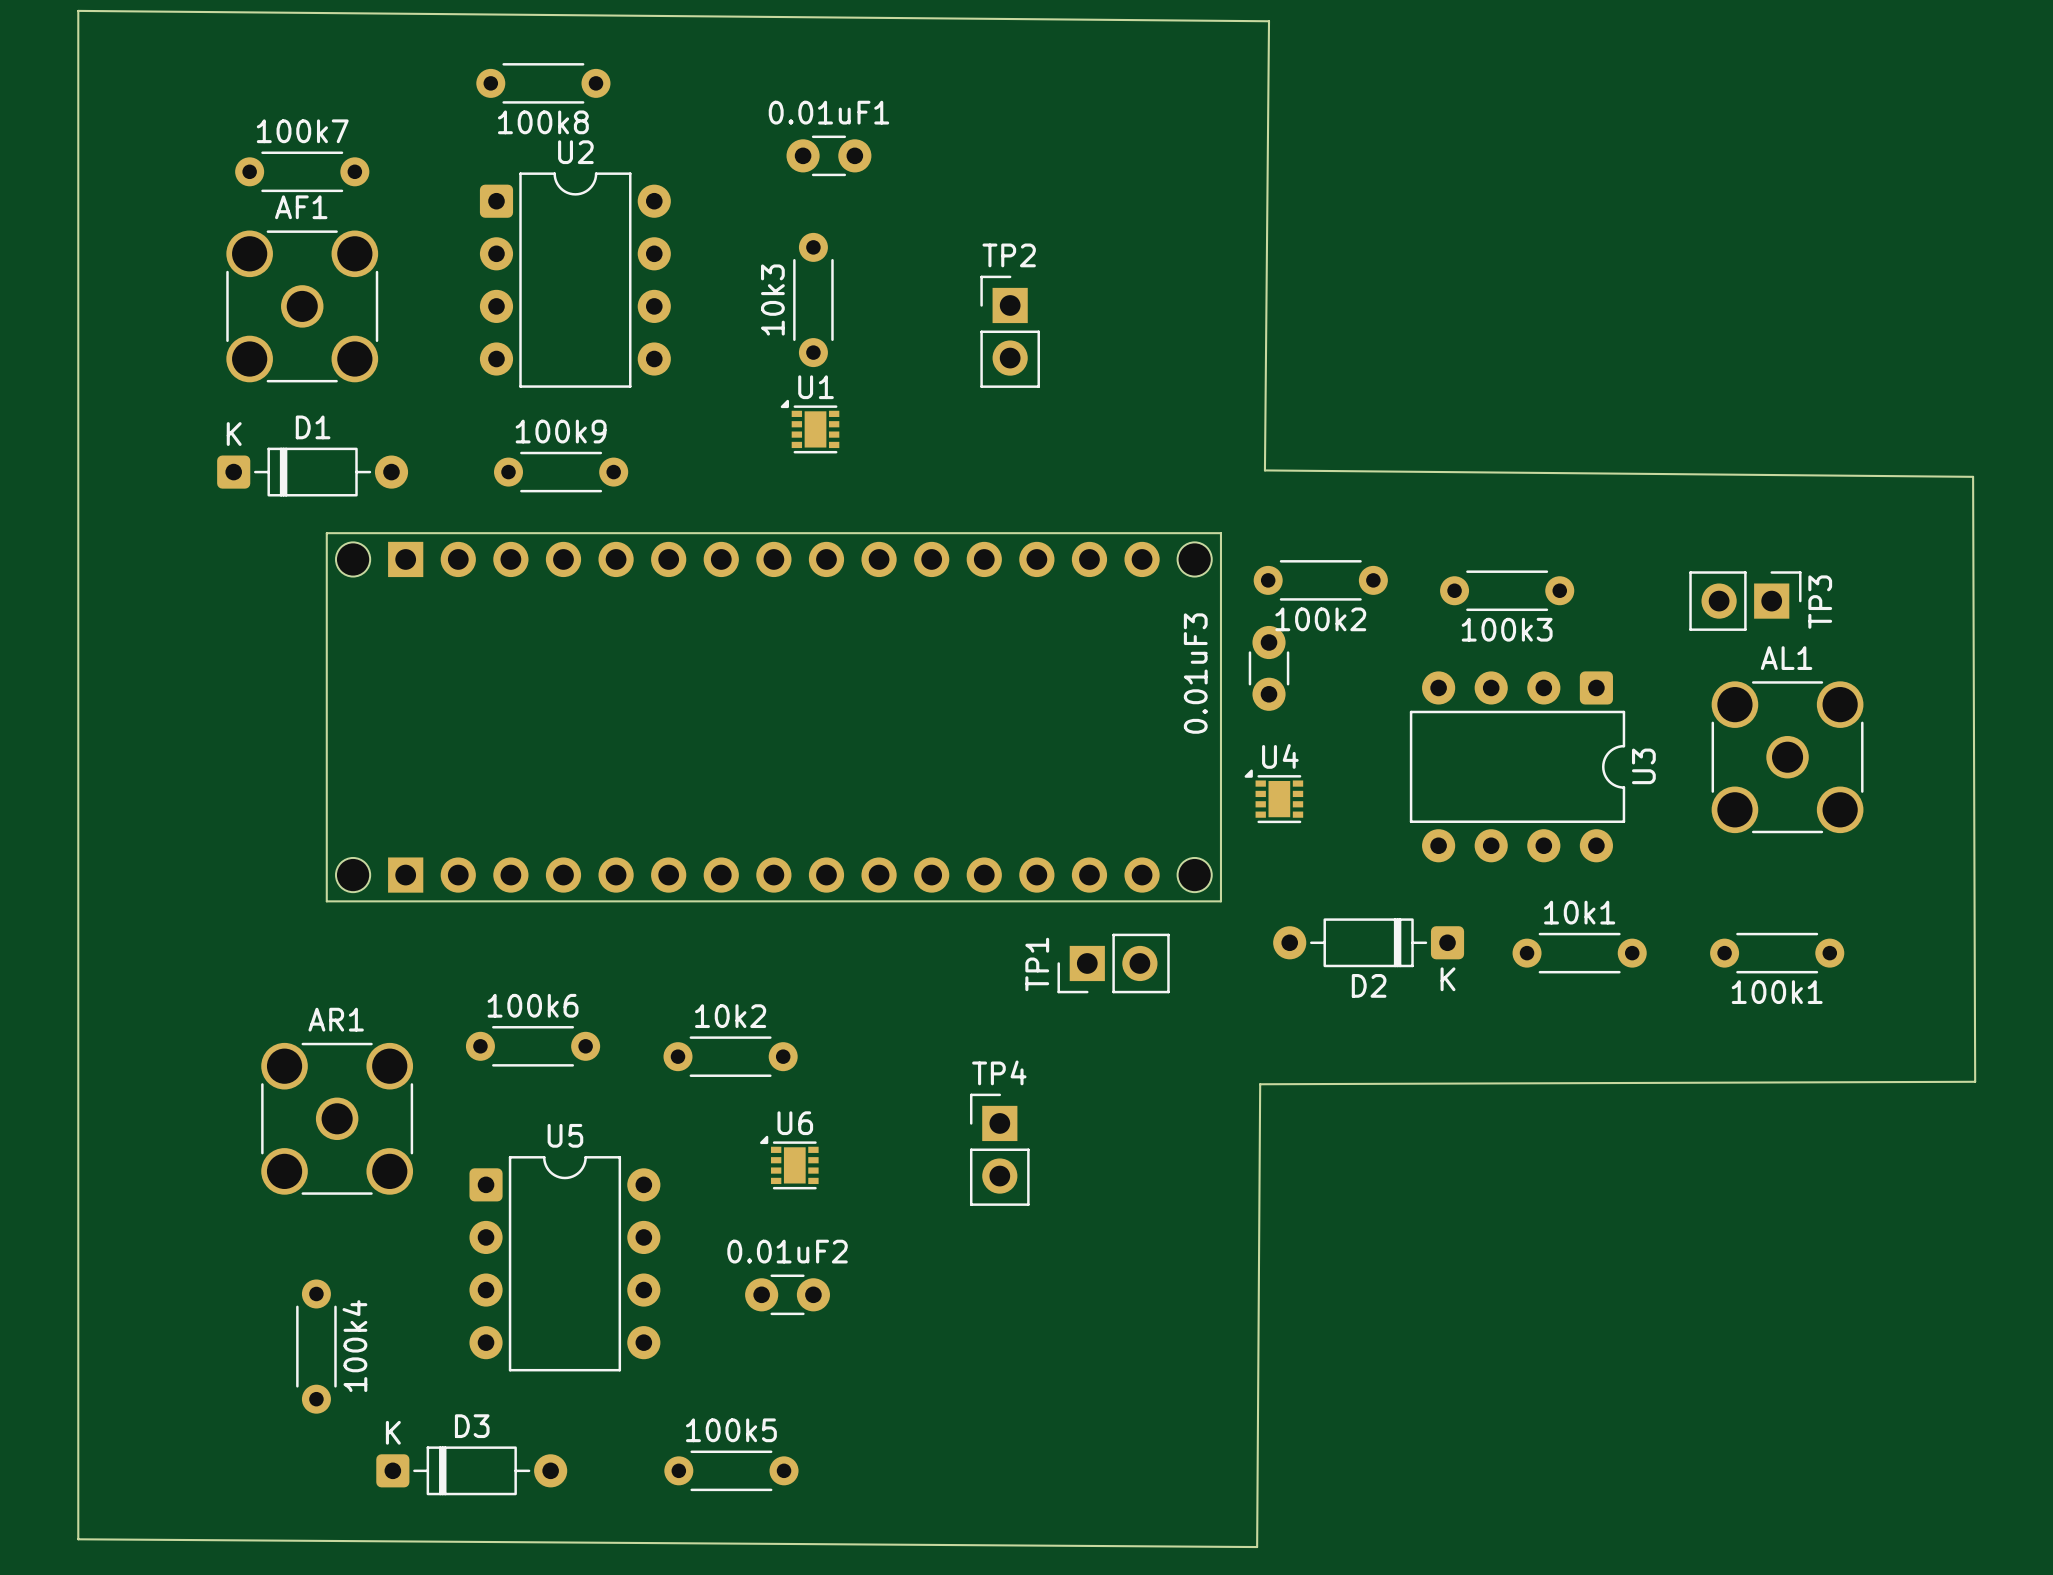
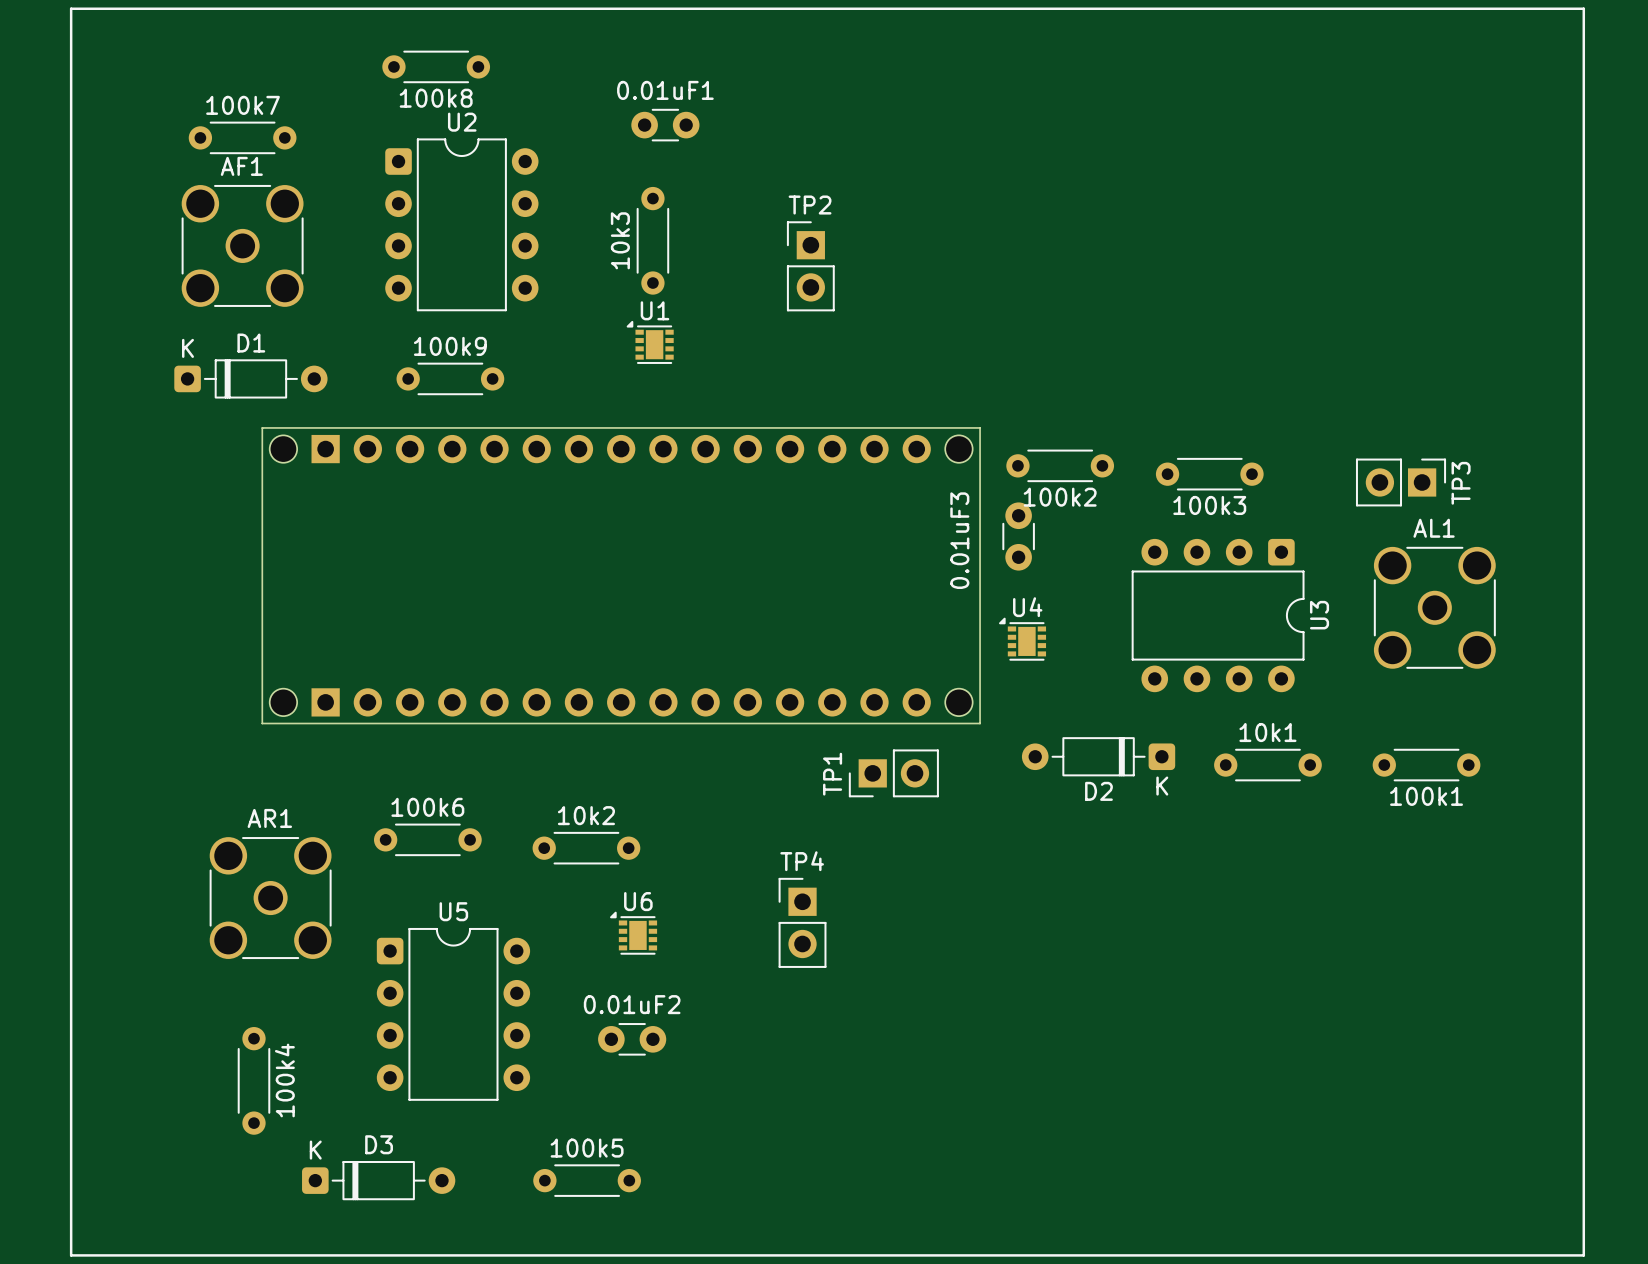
board edge: (78, 10) (1269, 21) (1264, 470) (1973, 476) (1975, 1081) (1260, 1084) (1257, 1547) (78, 1539) (78, 10) -> none
line: none -> (71, 8) (1583, 8) (1583, 1255) (71, 1255) (71, 8)

